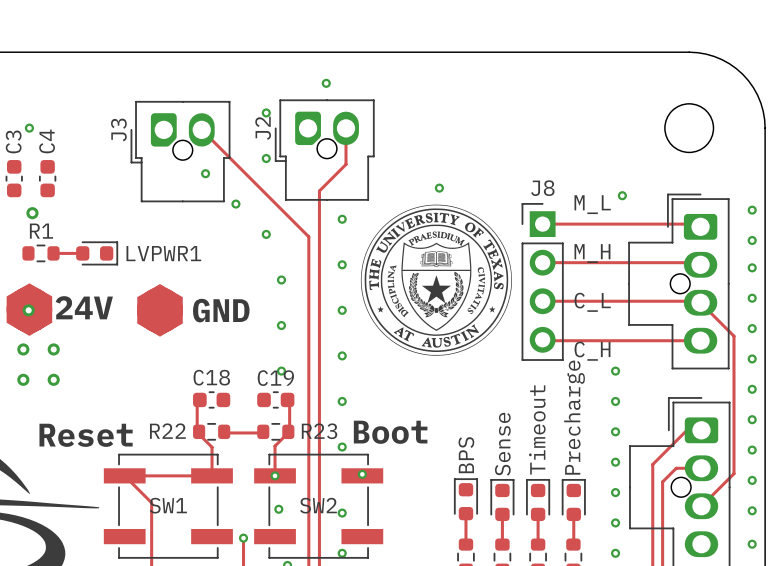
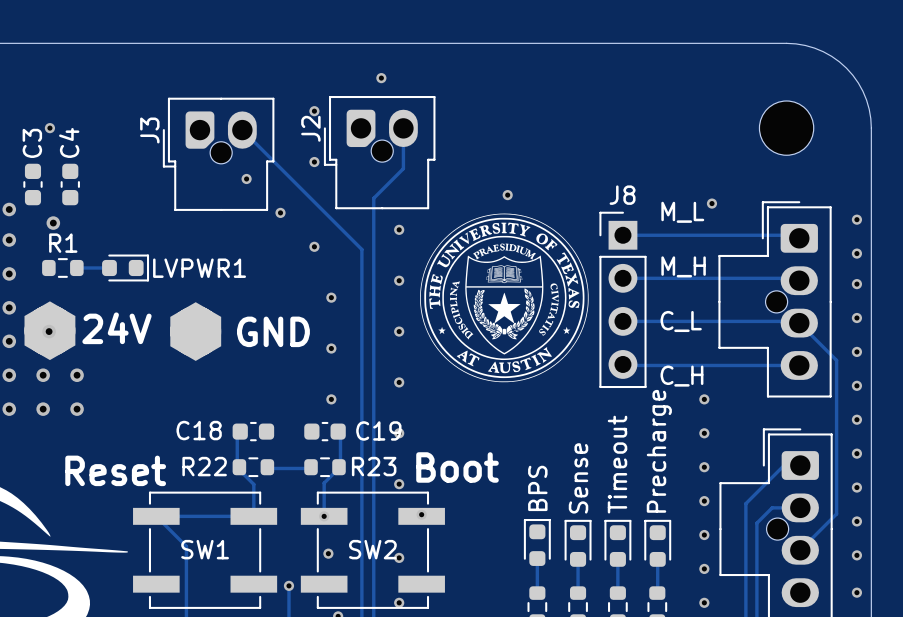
C18 name position: C18 (211, 377) -> C18 (199, 430)
C19 name position: C19 (275, 378) -> C19 (378, 430)

